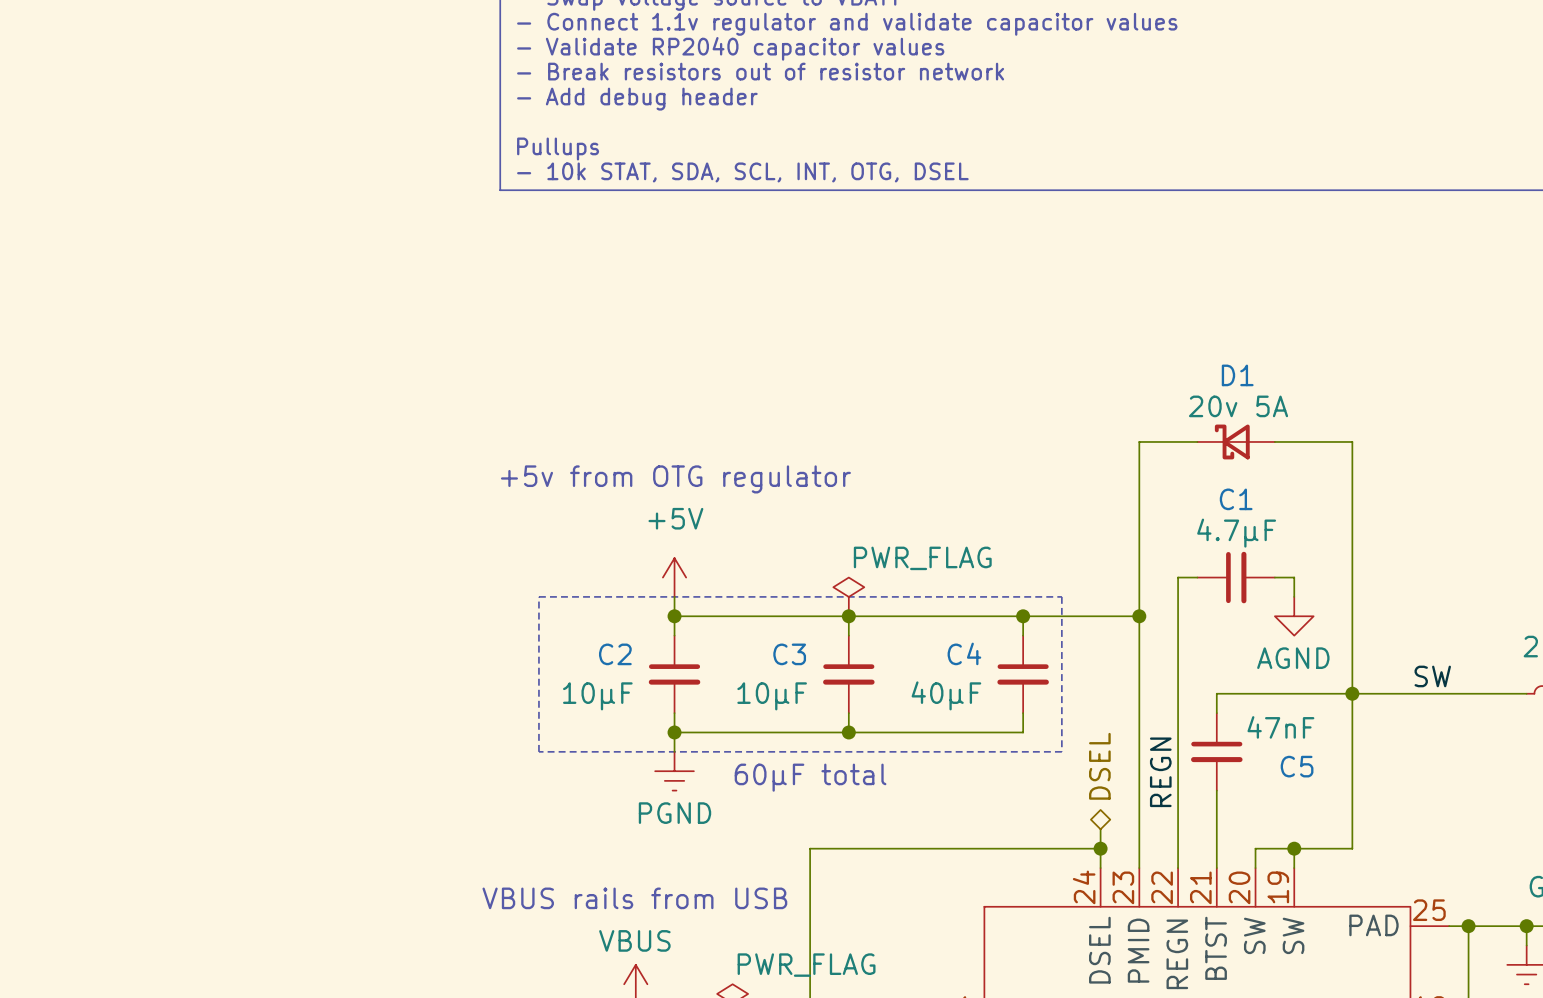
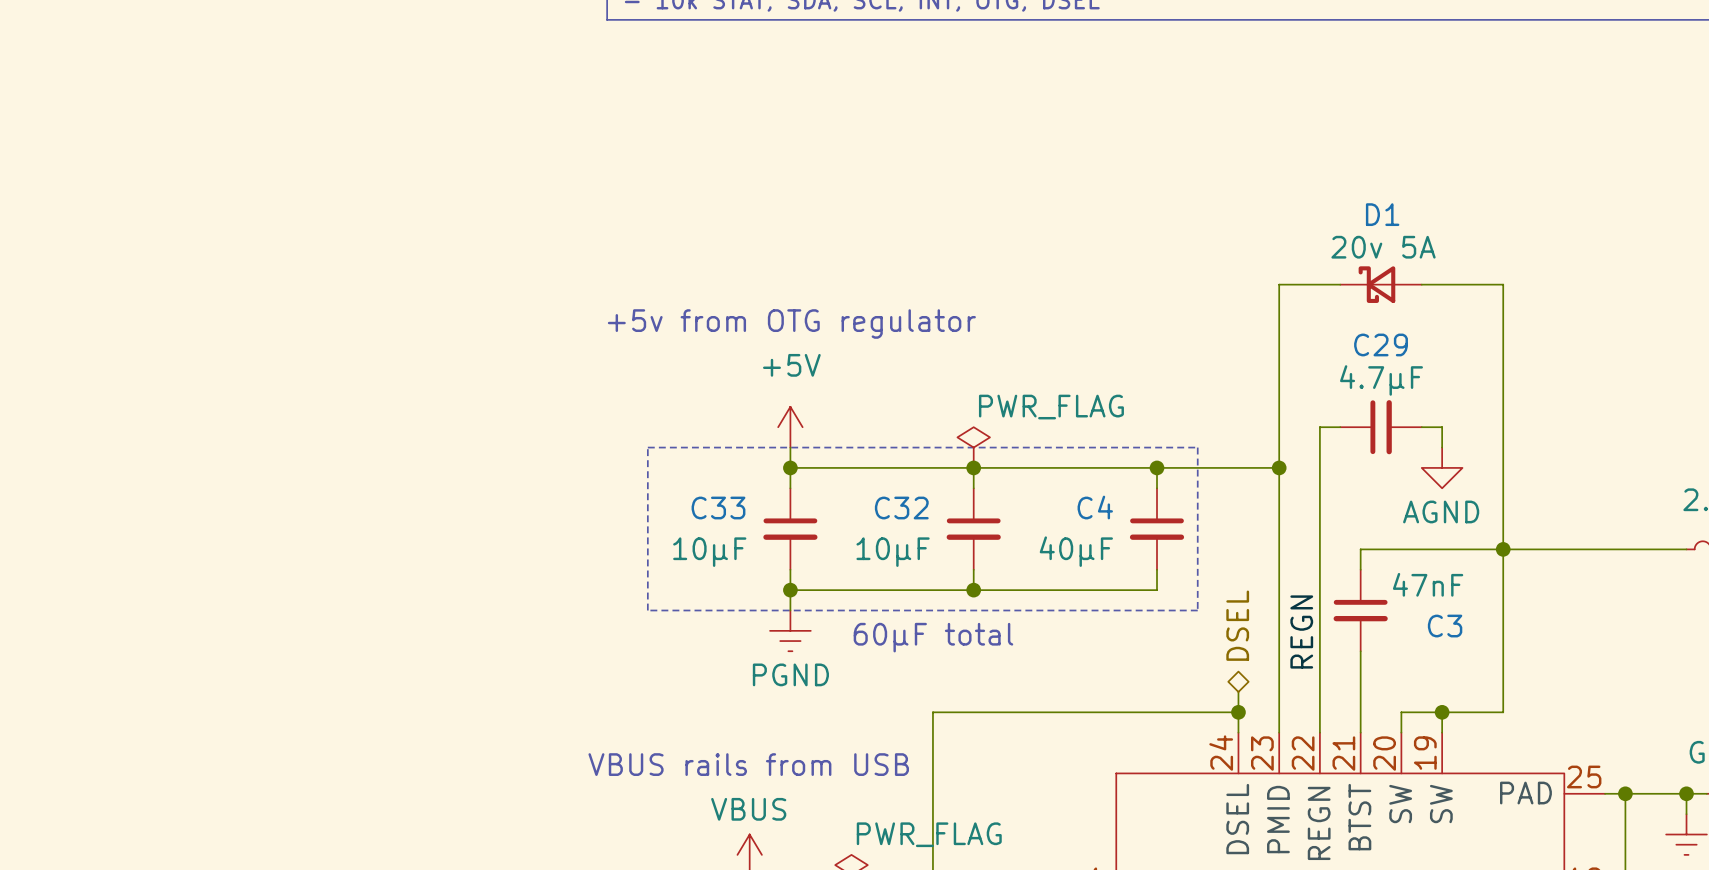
C1 name: C1 (1236, 499) -> C29 (1381, 344)
C2 name: C2 (615, 654) -> C33 (718, 508)
C3 name: C3 (789, 654) -> C32 (901, 508)
label: SW (1432, 676) -> none
C5 name: C5 (1297, 766) -> C3 (1445, 626)

